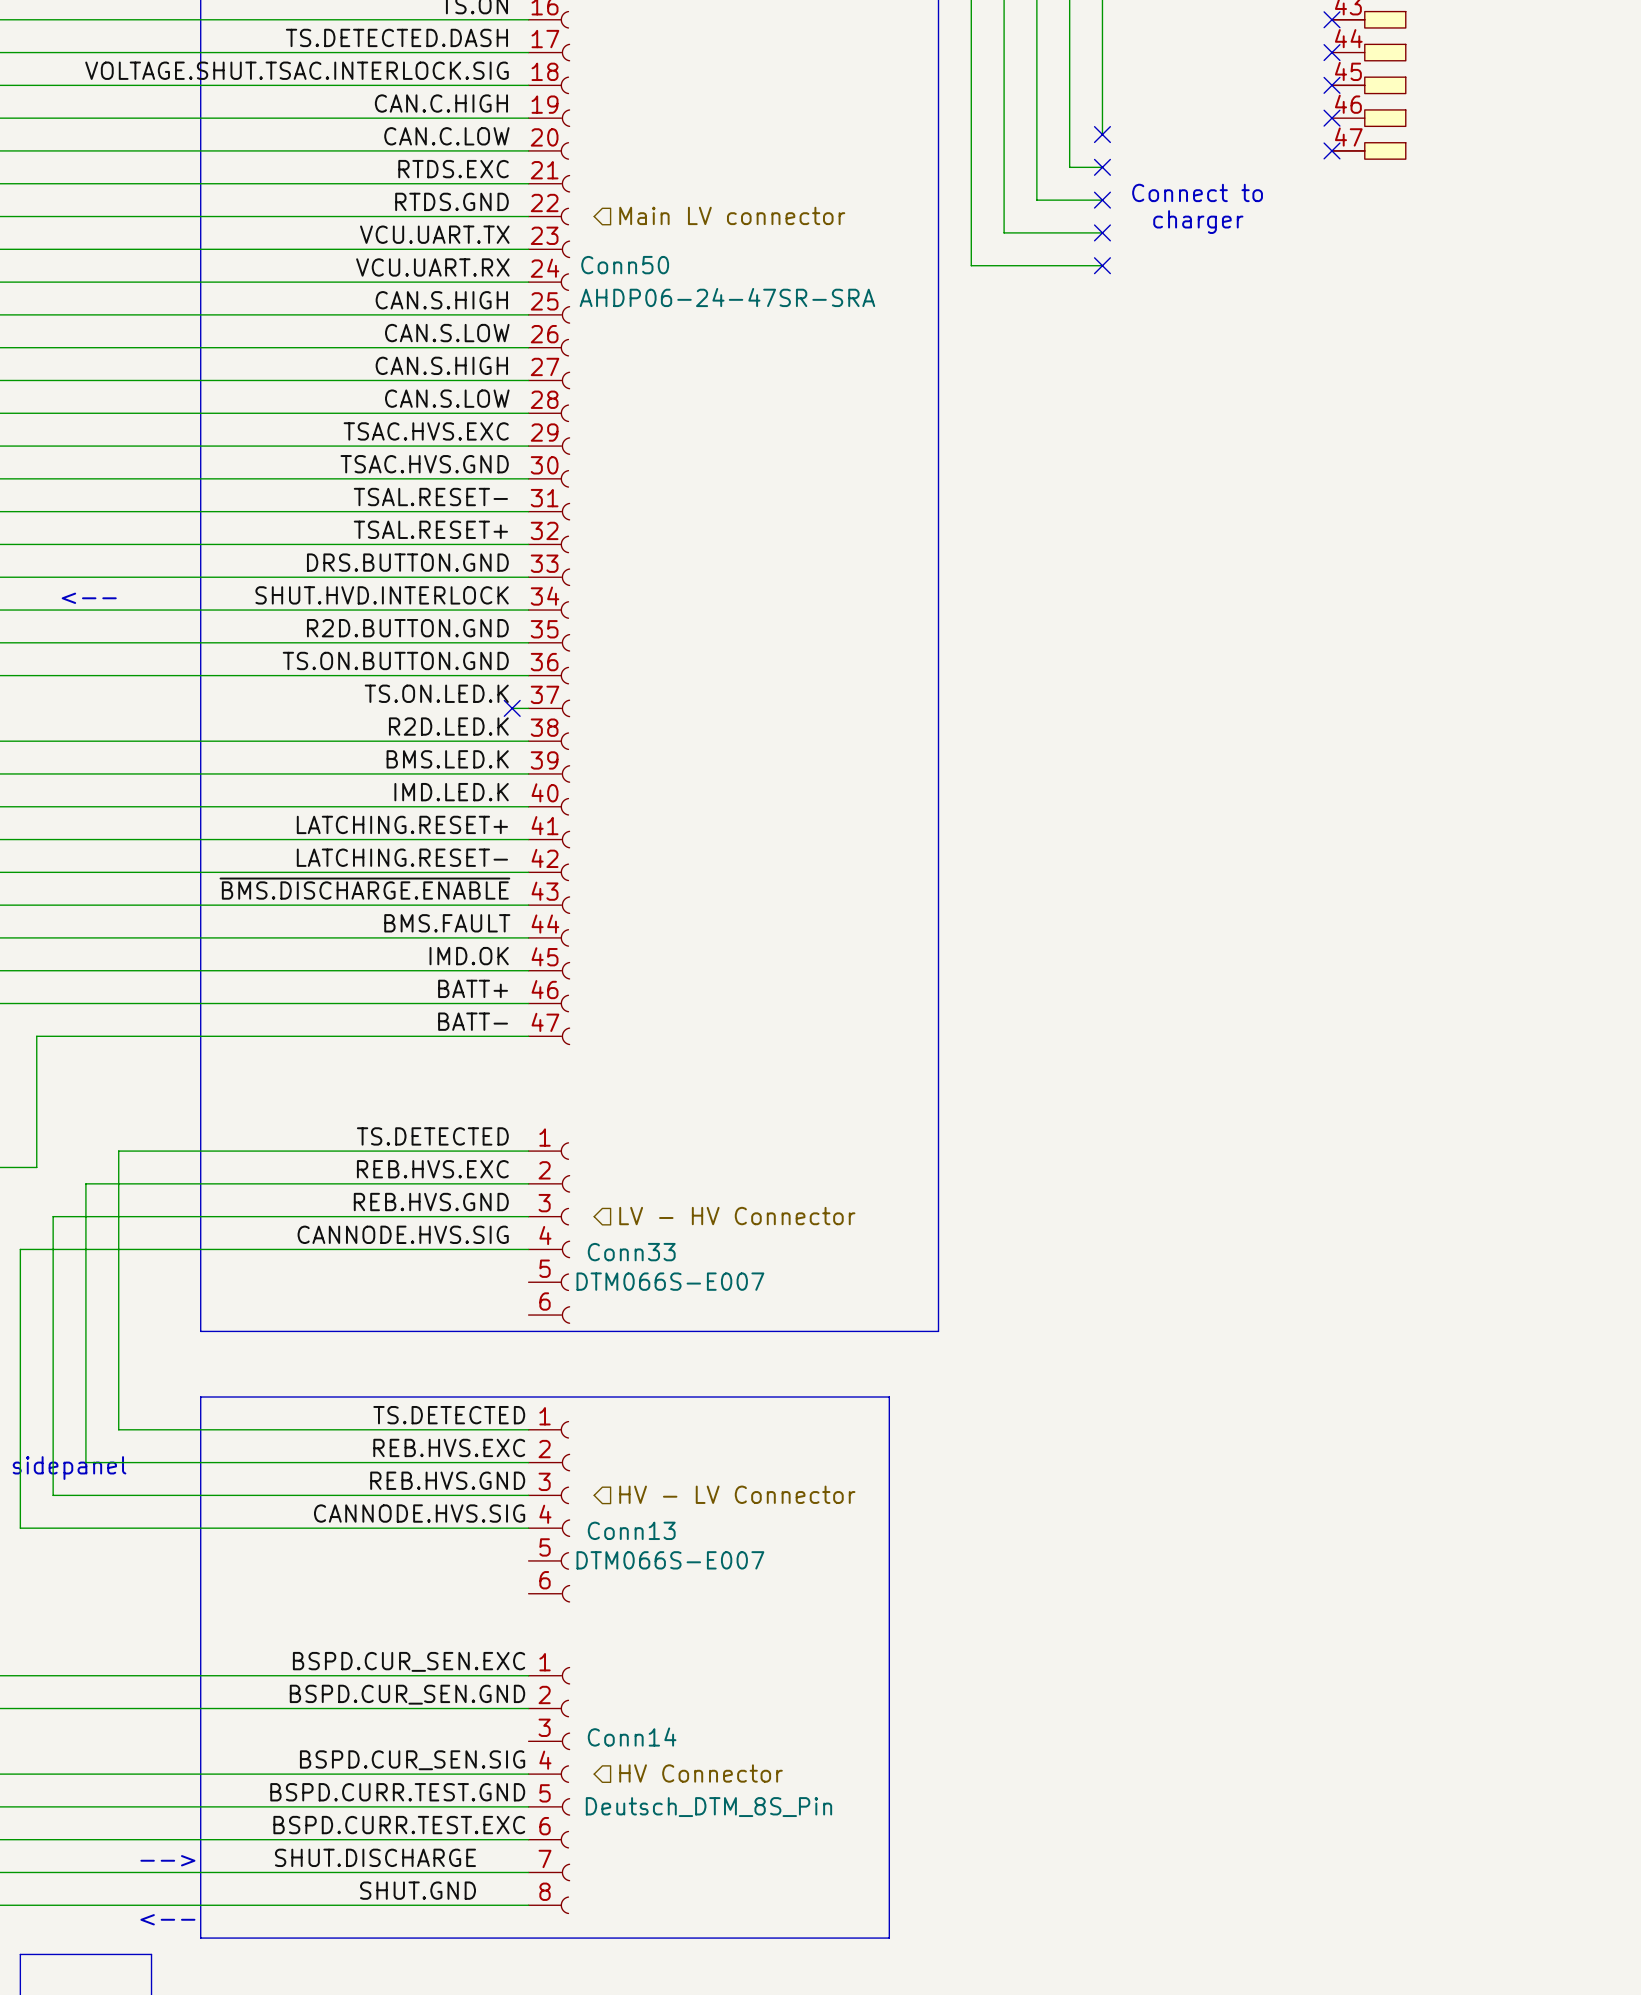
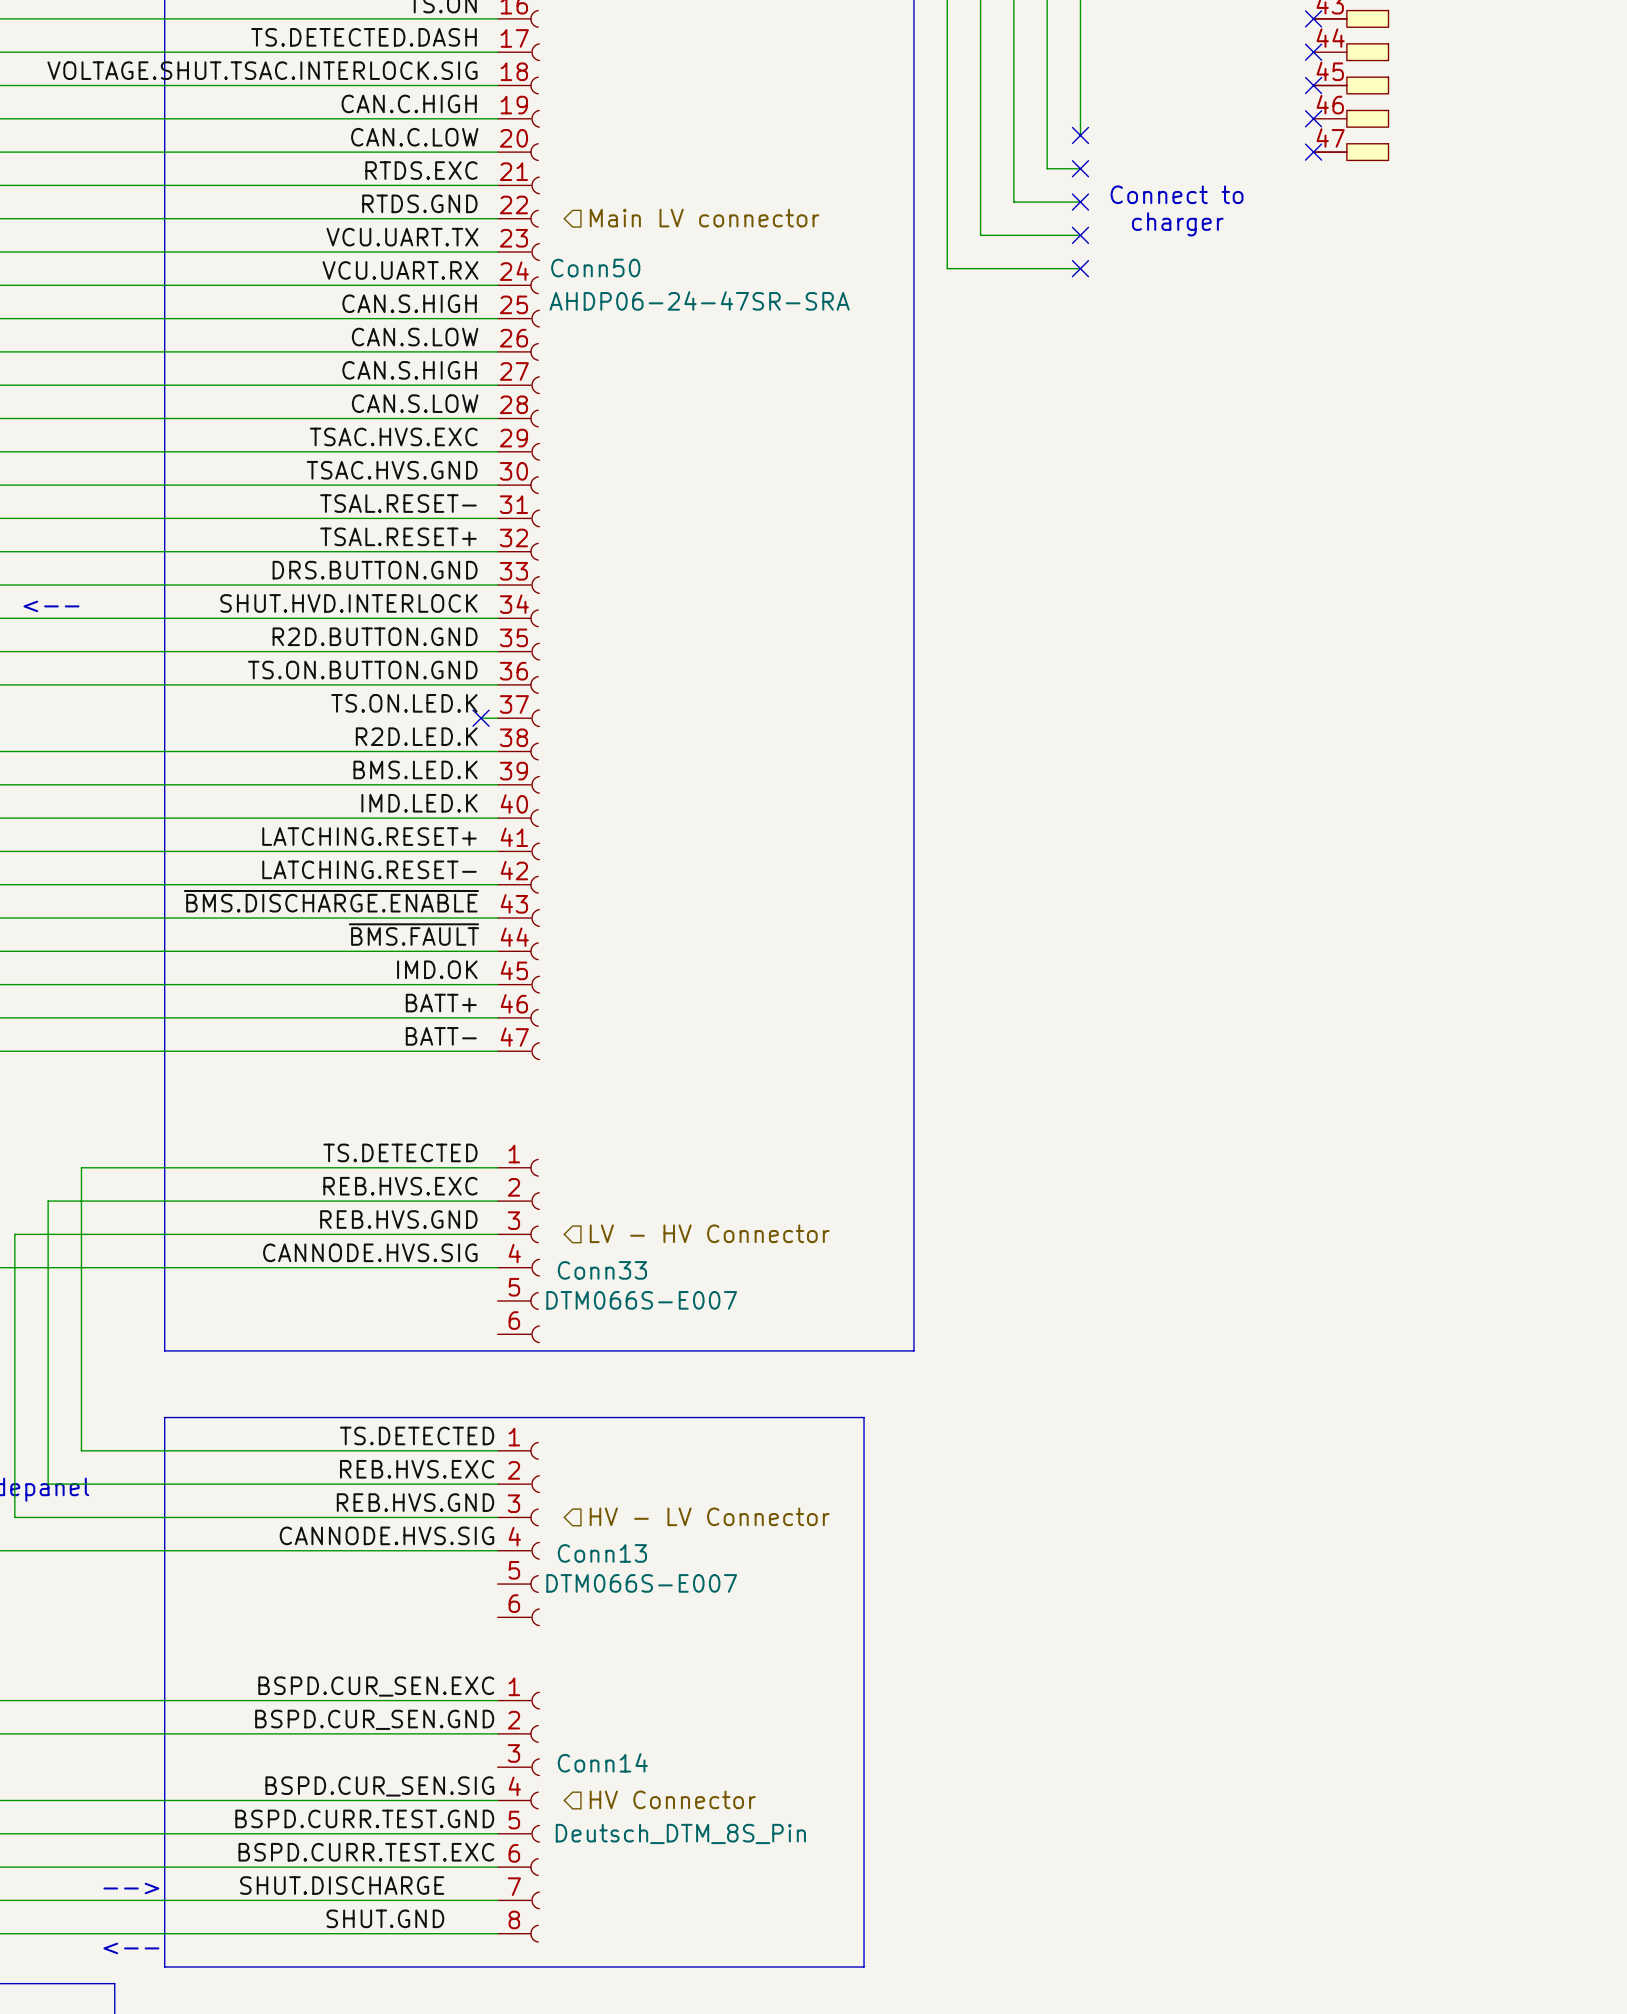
label: BMS.FAULT (447, 923) -> ~{BMS.FAULT} (413, 934)

